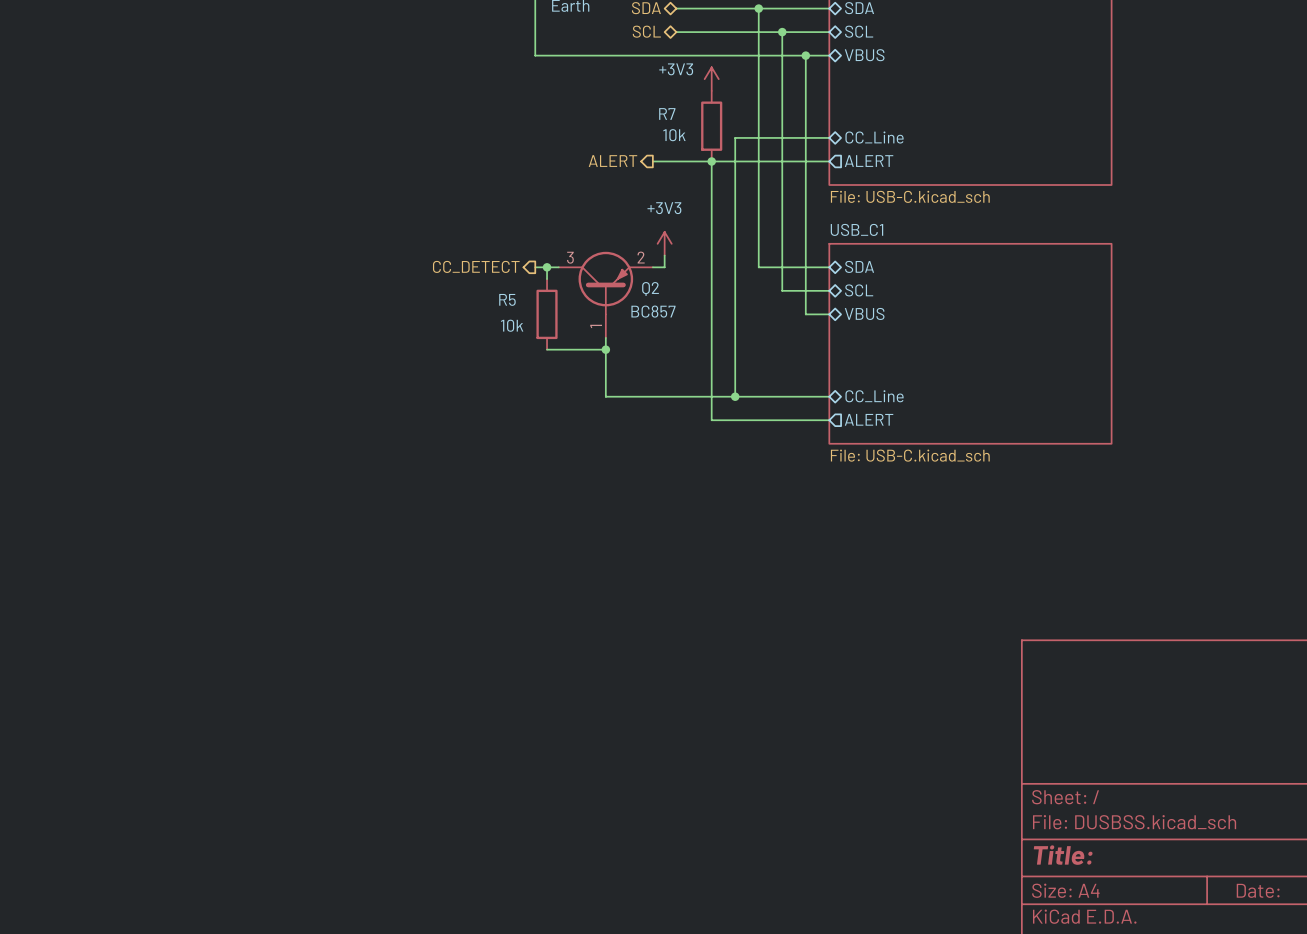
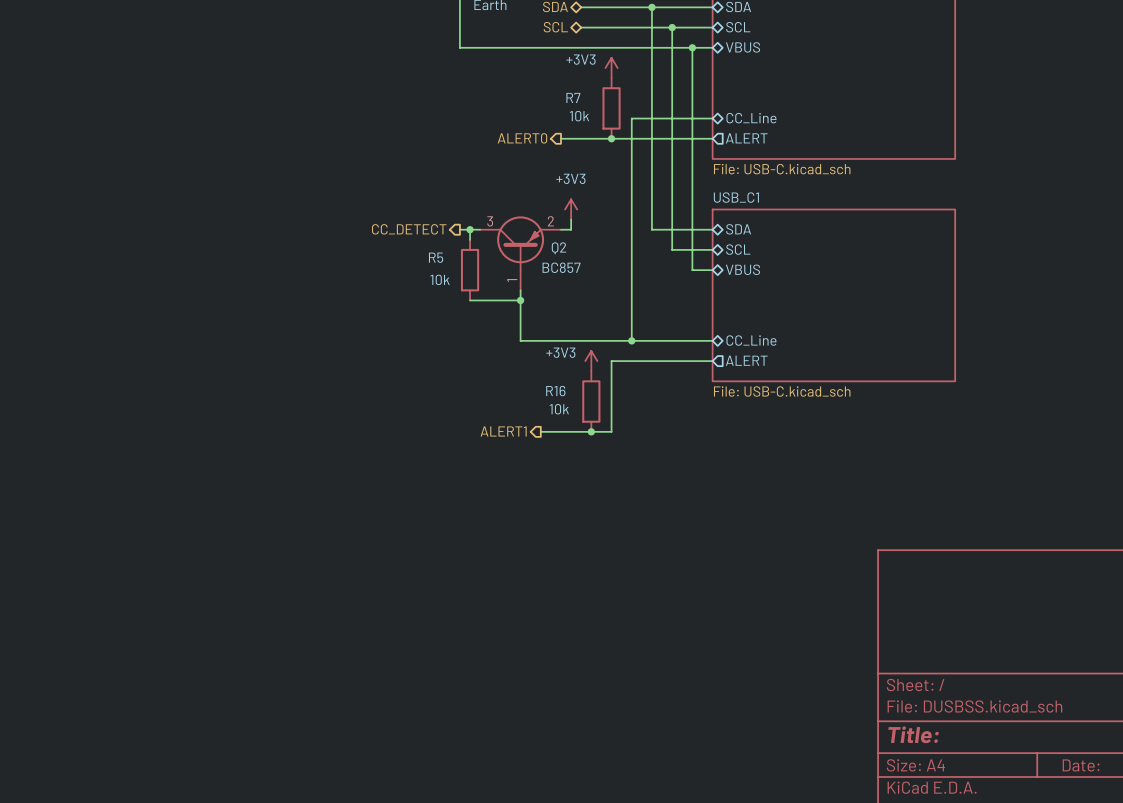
hierarchical label: ALERT (612, 161) -> ALERT0 (522, 138)
wire: (711, 161) (711, 420) -> (540, 431) (611, 431) (611, 361)
power symbol: none -> +3V3 (591, 361)
R16: none -> 10k (591, 401)
hierarchical label: none -> ALERT1 (503, 431)
junction: none -> (591, 431)

